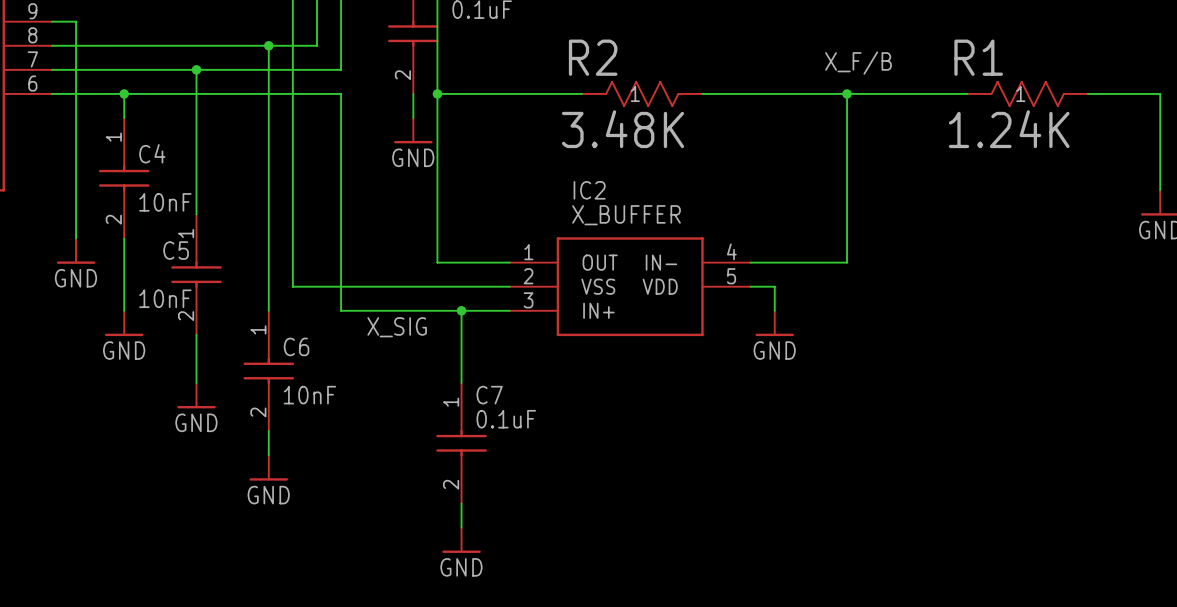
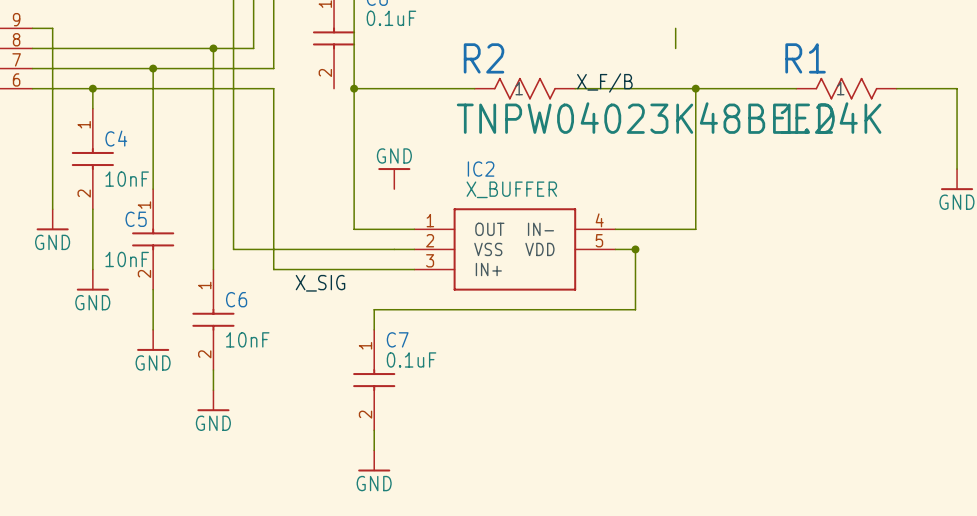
wire: none -> (675, 28) (675, 48)
label position: X_F/B (858, 63) -> X_F/B (604, 82)
wire: (413, 93) (413, 118) -> none
R2 value: 3.48K (623, 129) -> TNPW04023K48BEED (645, 118)
power symbol position: GND (413, 130) -> GND (394, 178)
power symbol rotation: 0° (413, 142) -> 180° (394, 169)
junction: none -> (635, 249)
wire: (461, 310) (461, 358) -> (635, 269) (635, 309) (374, 309)
junction: (461, 310) -> none
power symbol: GND (774, 323) -> none

